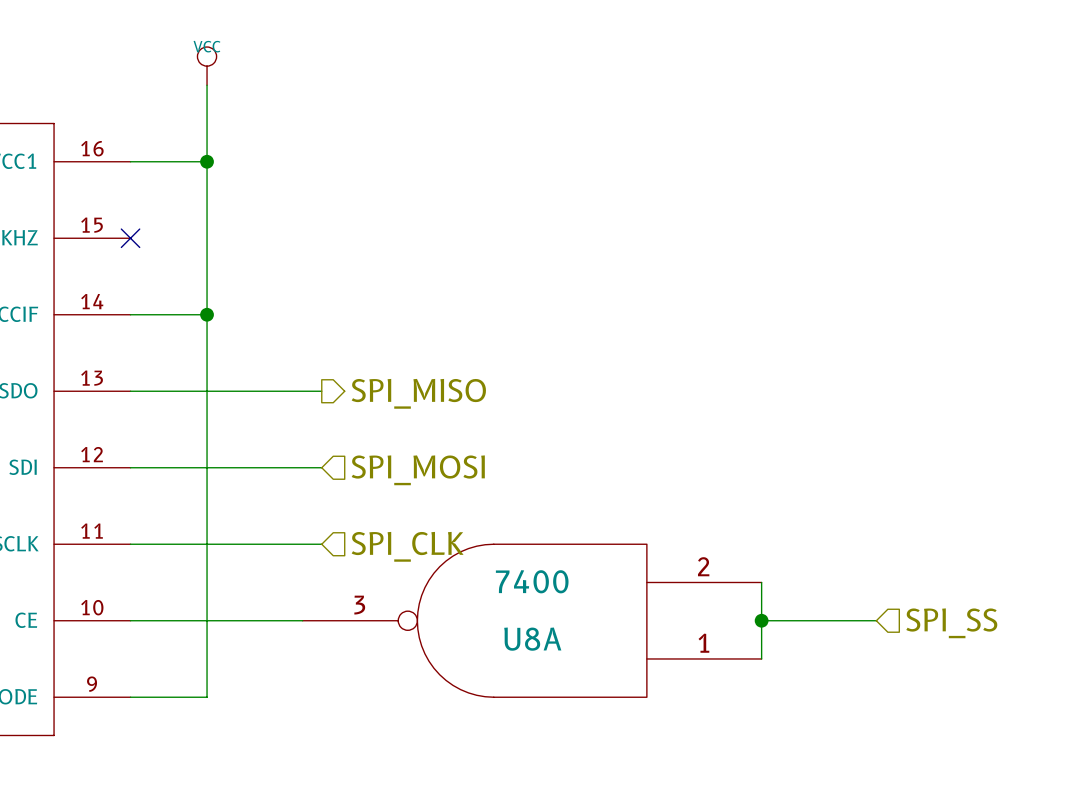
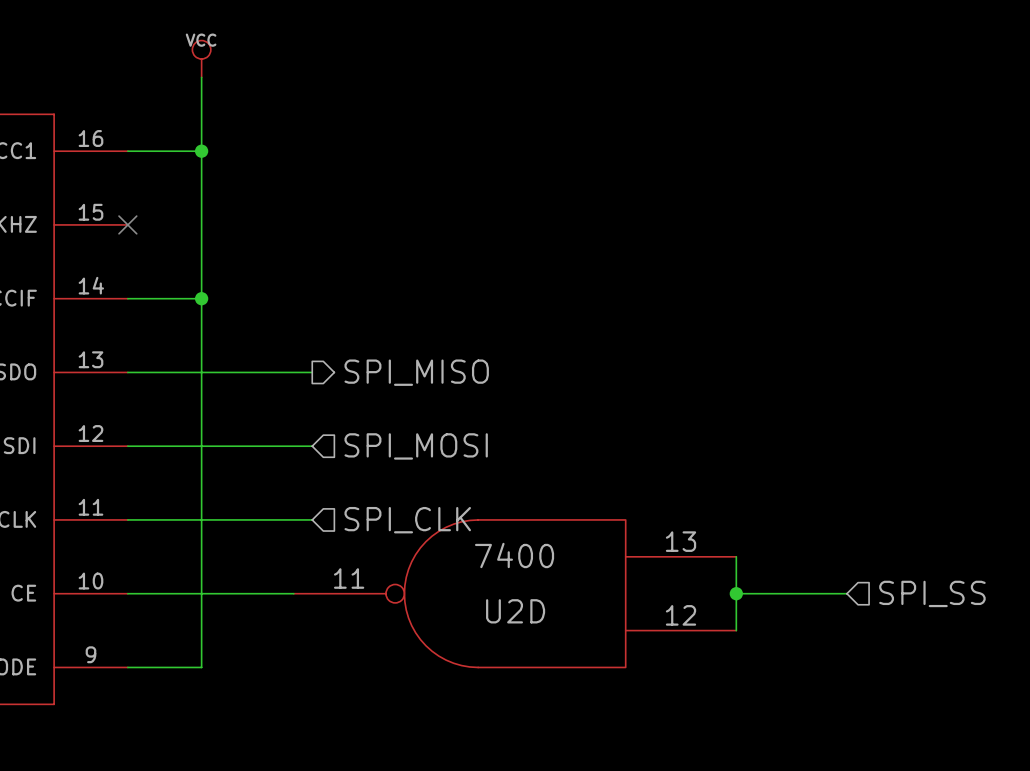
U8A pin number: 2 (703, 566) -> 13 (681, 541)
U8A pin number: 3 (359, 605) -> 11 (349, 578)
U8A name: U8A (532, 639) -> U2D (515, 611)
U8A pin number: 1 (703, 643) -> 12 (681, 615)

